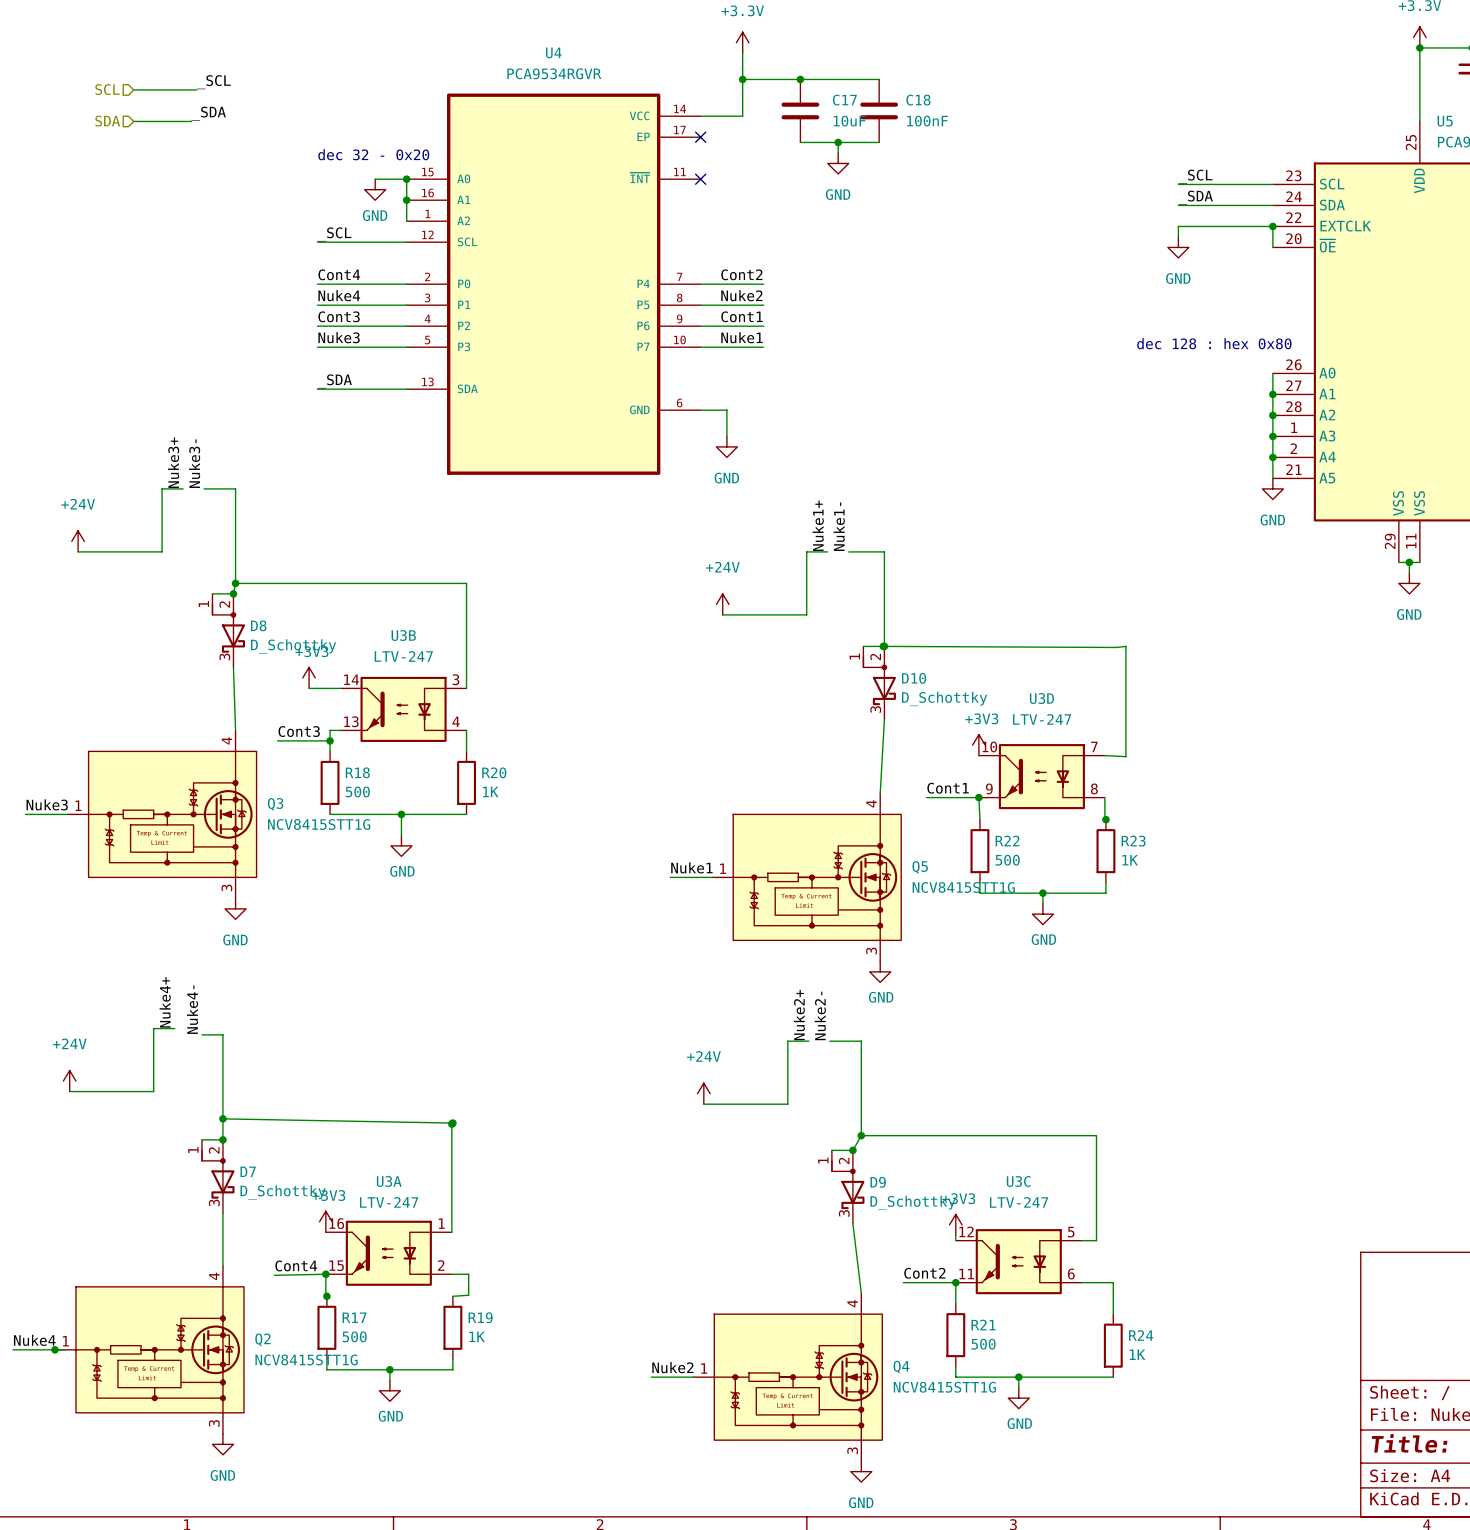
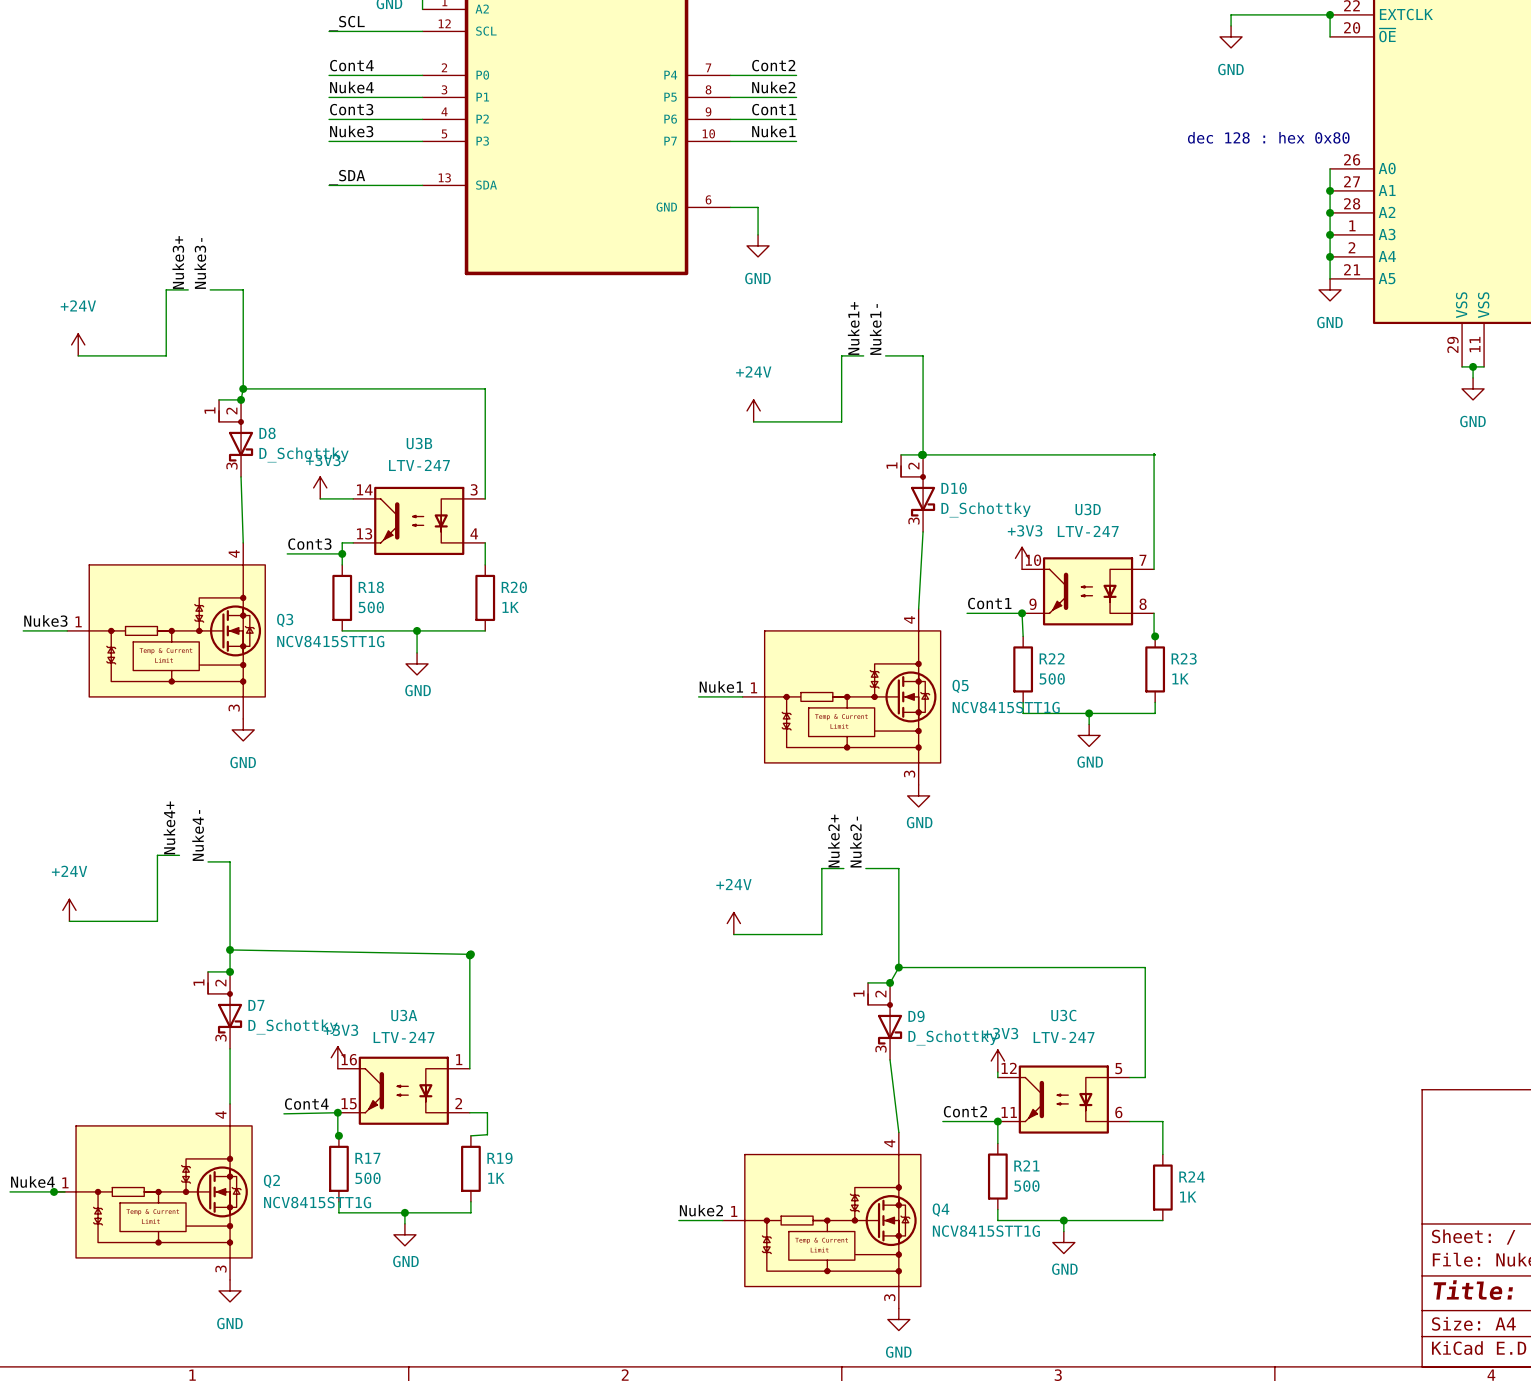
wire: (884, 646) (1125, 646) (1125, 756) (1104, 755) -> (923, 454) (1155, 454) (1154, 453) (1154, 569)

